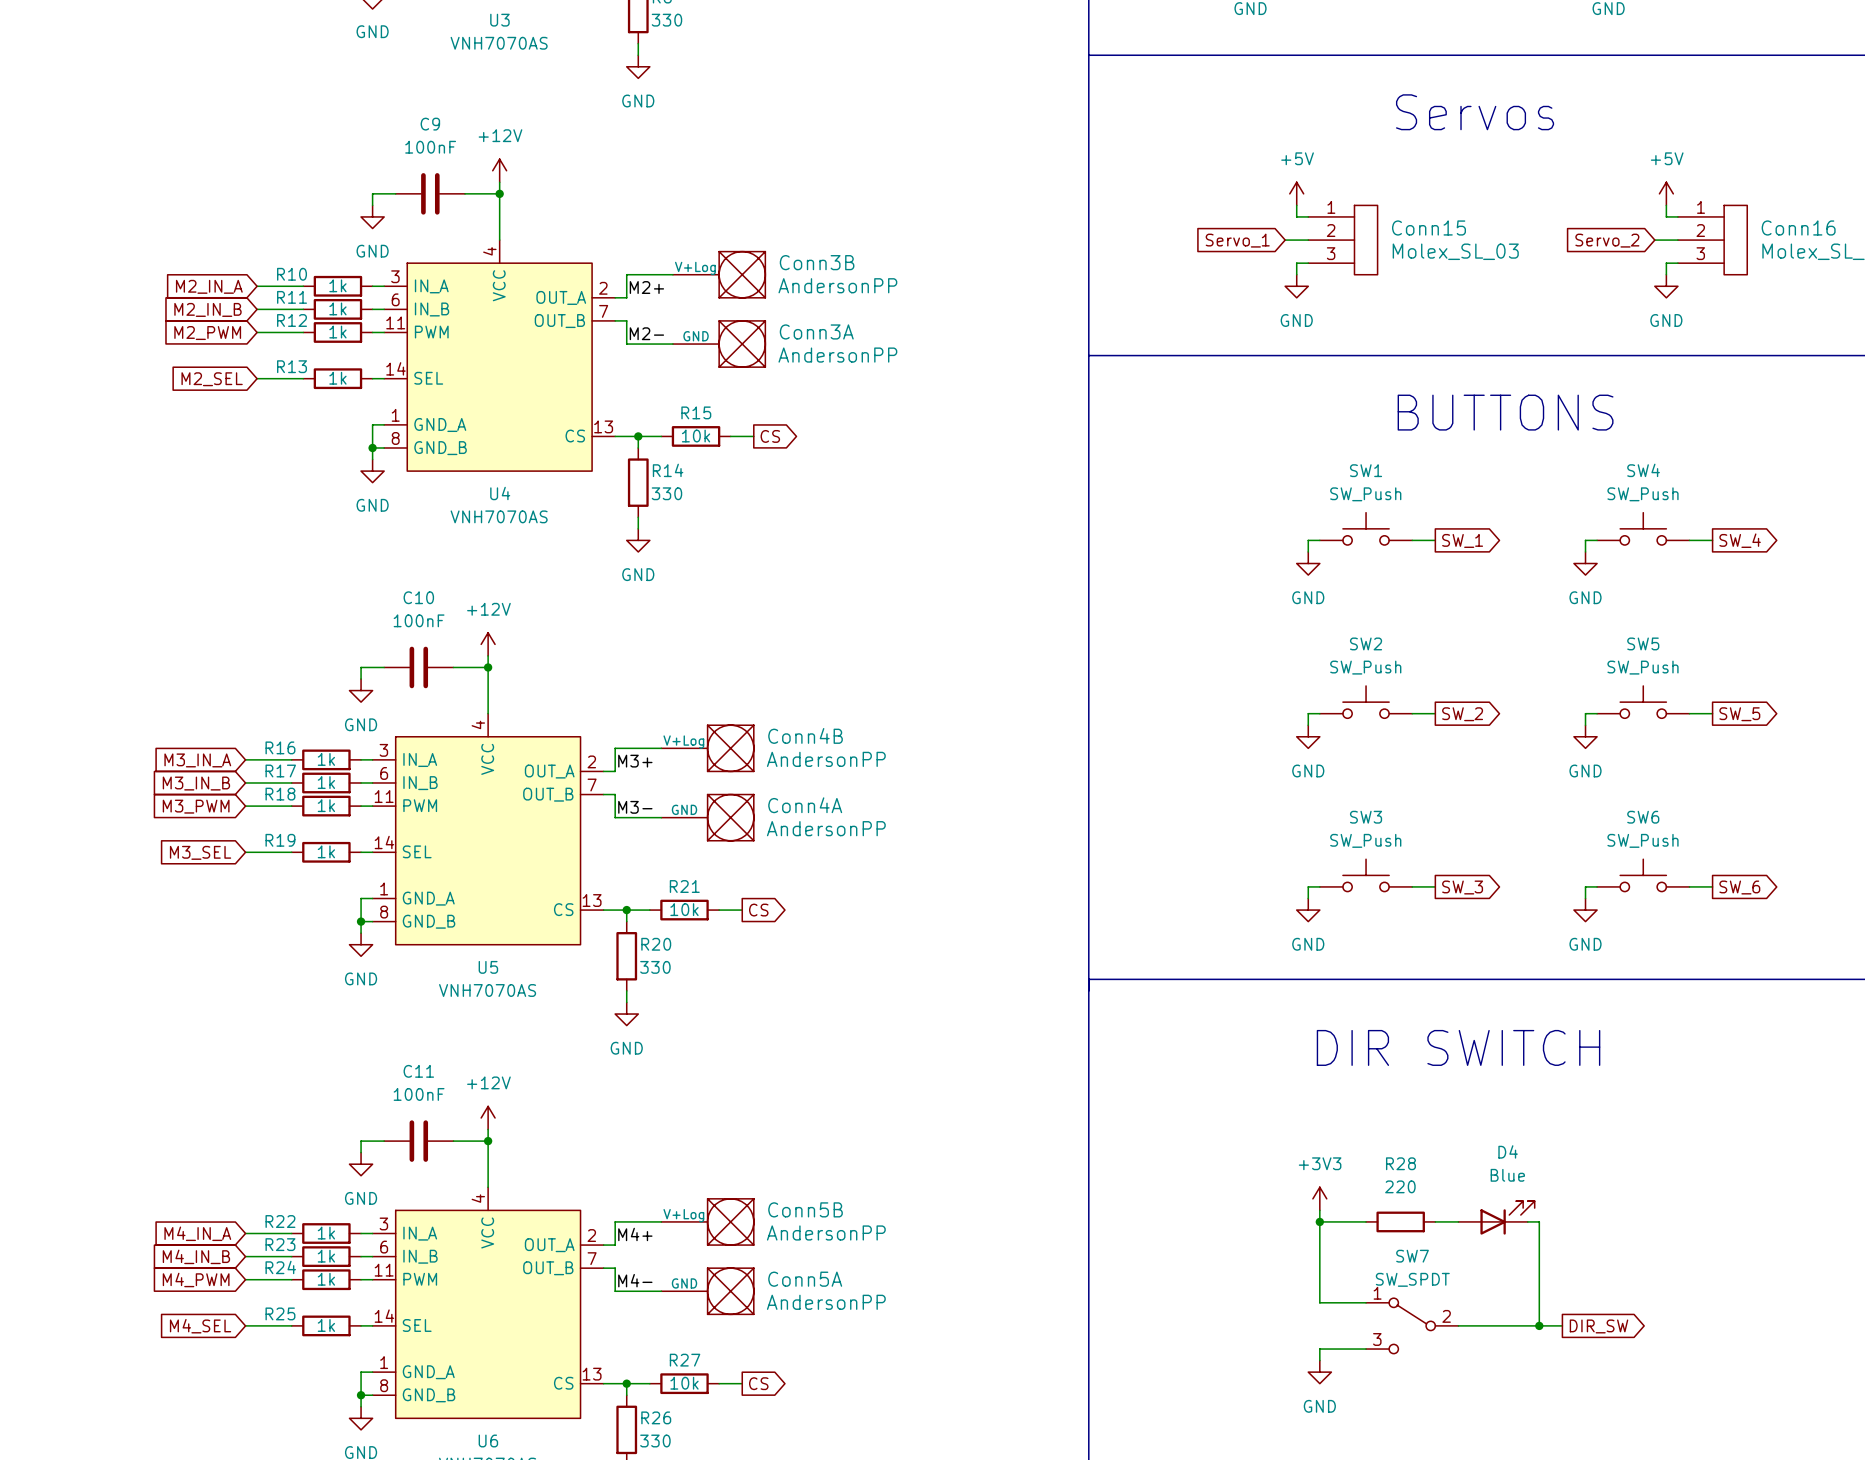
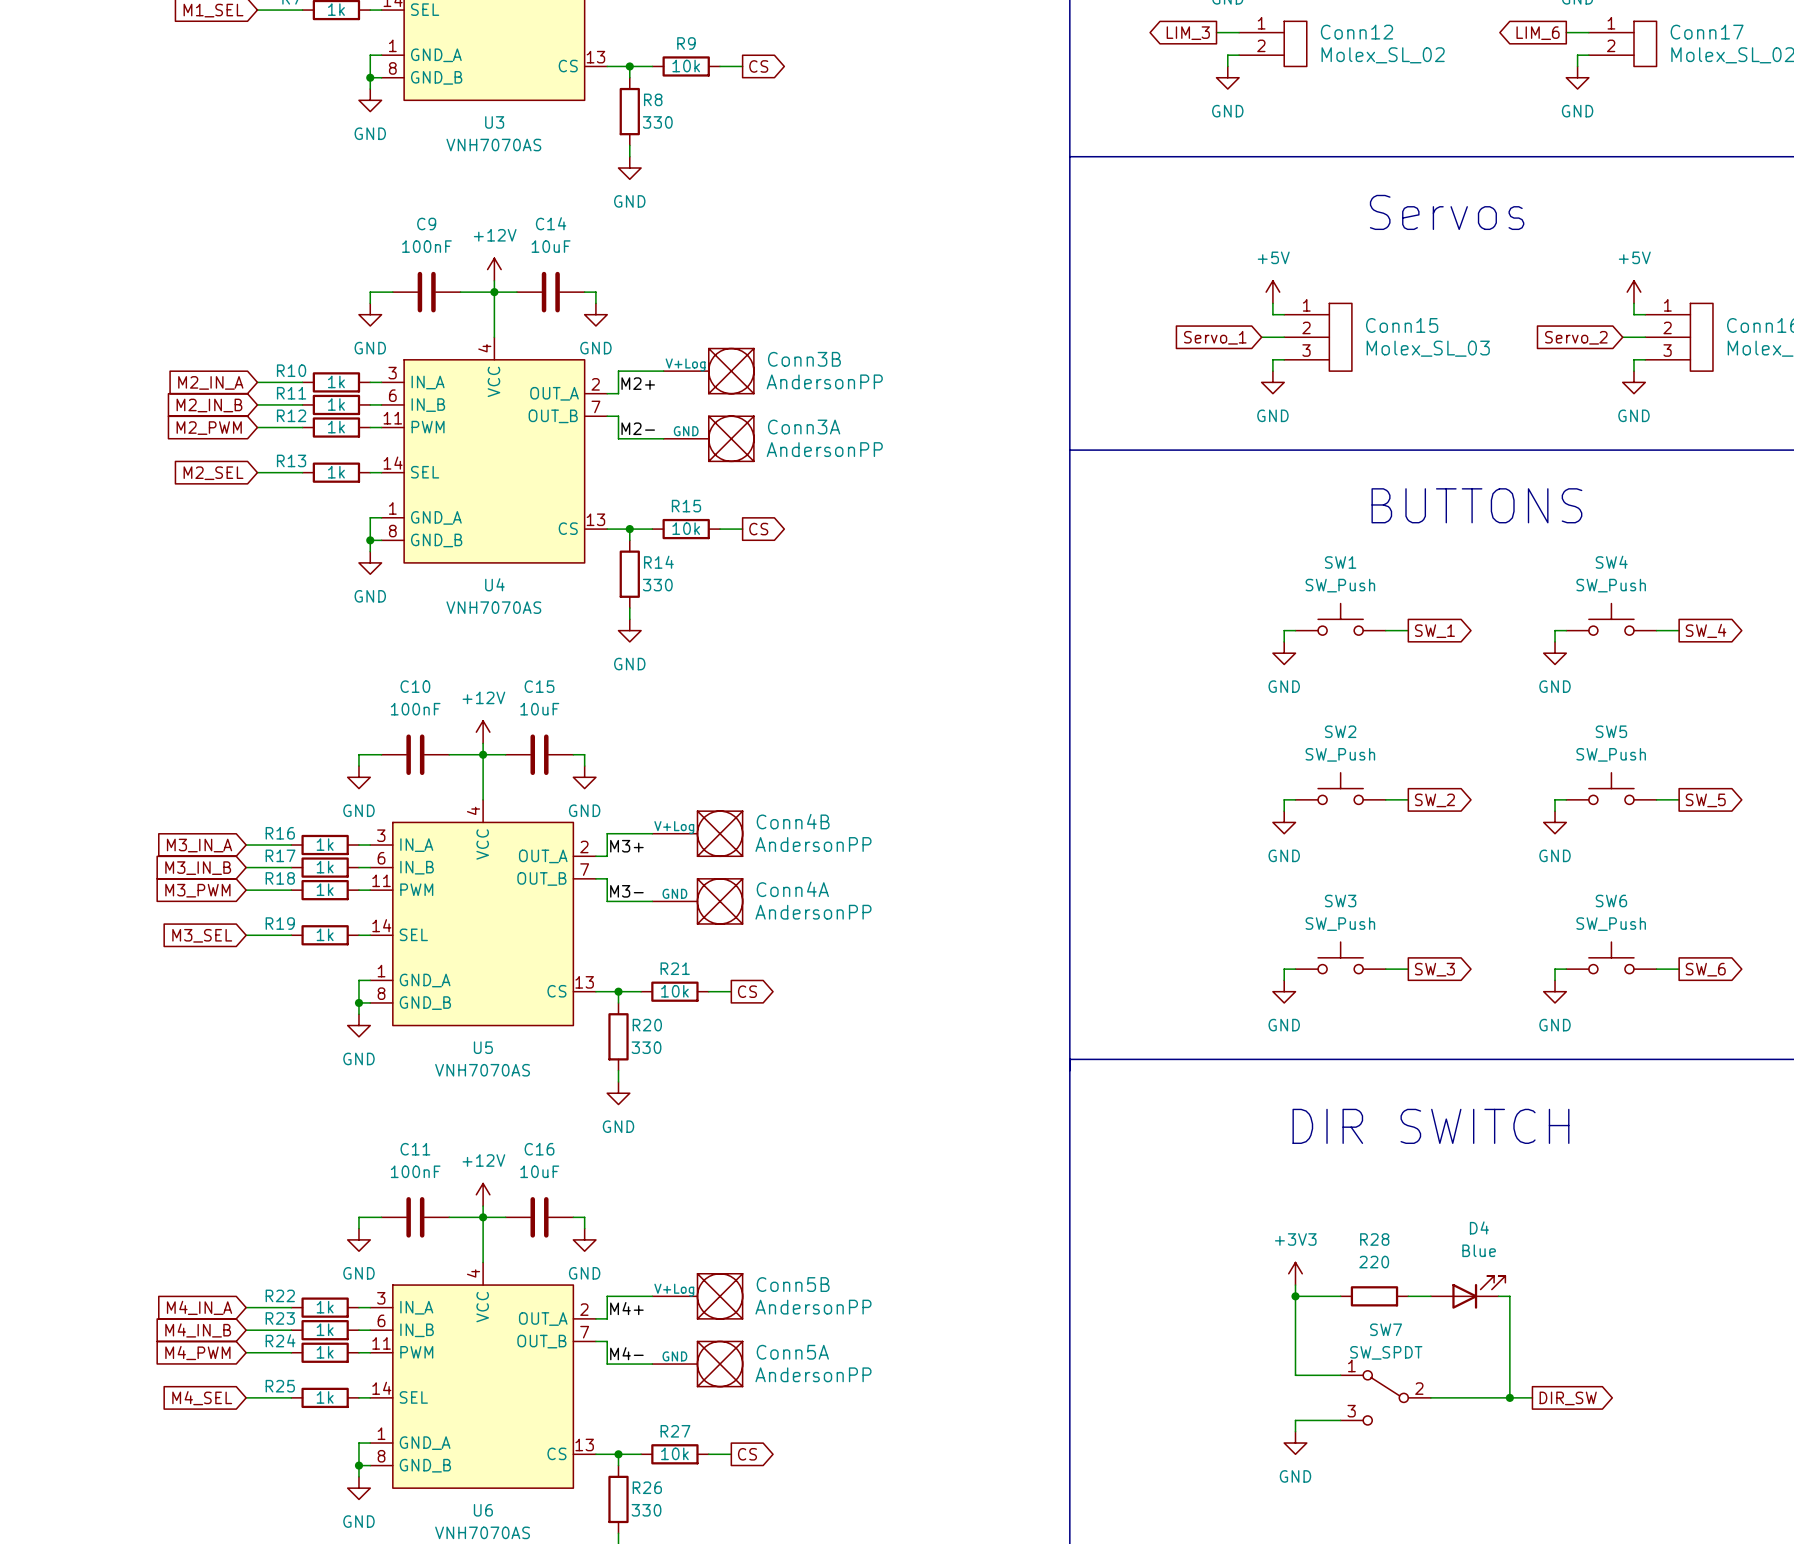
wire: none -> (494, 292) (516, 292)
C14: none -> 10uF (550, 292)
wire: none -> (584, 292) (595, 292) (595, 303)
power symbol: none -> GND (595, 314)
wire: none -> (483, 754) (505, 754)
C15: none -> 10uF (539, 754)
wire: none -> (573, 754) (584, 754) (584, 766)
power symbol: none -> GND (584, 777)
wire: none -> (483, 1217) (505, 1217)
C16: none -> 10uF (539, 1217)
wire: none -> (573, 1217) (584, 1217) (584, 1228)
power symbol: none -> GND (584, 1239)

